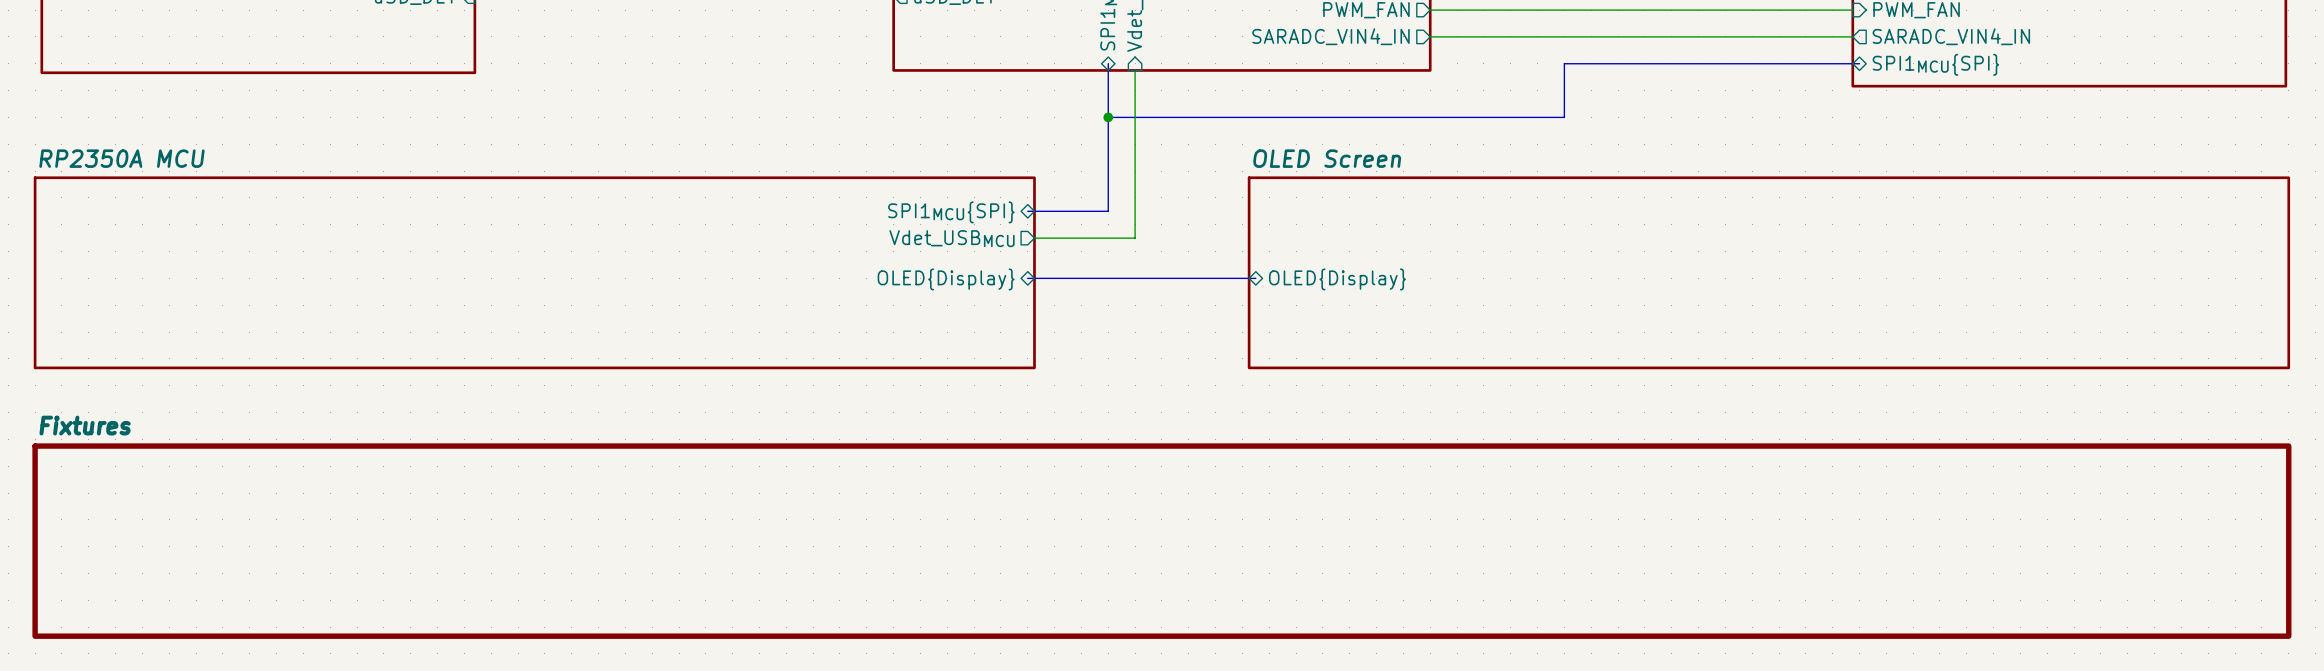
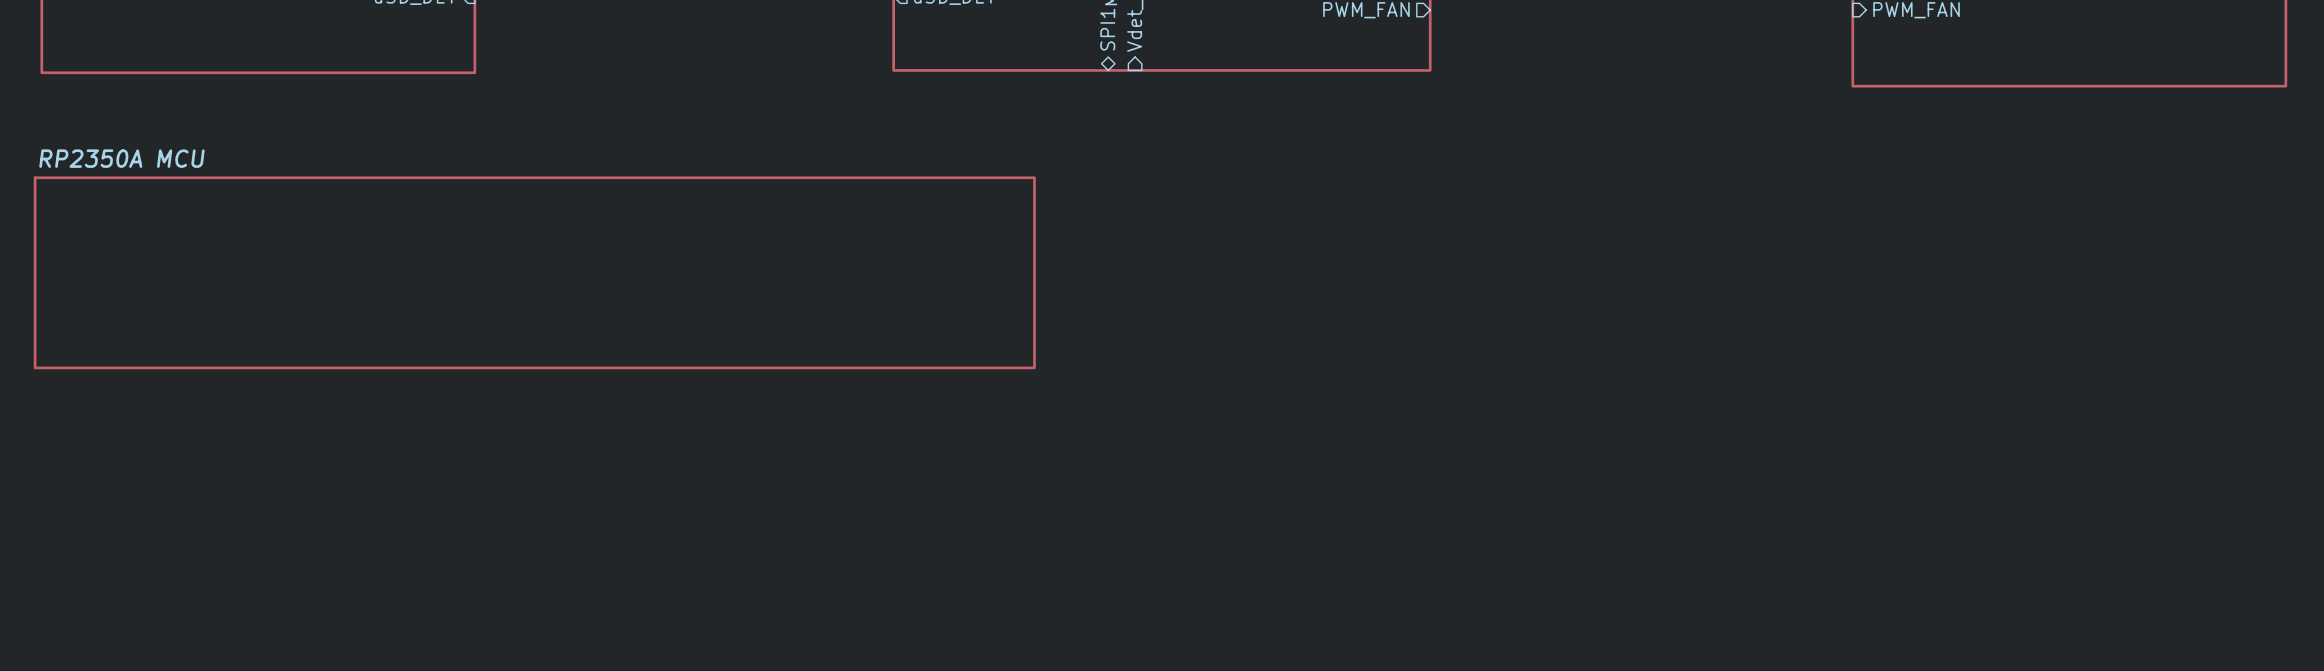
wire: (1430, 10) (1852, 10) -> none
sheet pin: SARADC_VIN4_IN (1331, 36) -> none
wire: (1430, 36) (1852, 36) -> none
sheet pin: SARADC_VIN4_IN (1951, 36) -> none
bus: (1108, 63) (1108, 211) (1027, 211) -> none
bus: (1859, 63) (1564, 63) (1564, 117) (1108, 117) -> none
sheet pin: SPI1MCU{SPI} (1935, 64) -> none
wire: (1135, 70) (1135, 238) (1034, 238) -> none
junction: (1108, 117) -> none
sheet pin: SPI1MCU{SPI} (951, 212) -> none
sheet pin: Vdet_USBMCU (952, 238) -> none
sheet OLED Screen: (1768, 272) -> none
bus: (1027, 278) (1255, 278) -> none
sheet pin: OLED{Display} (946, 279) -> none
sheet pin: OLED{Display} (1337, 279) -> none
sheet Fixtures: (1161, 541) -> none

